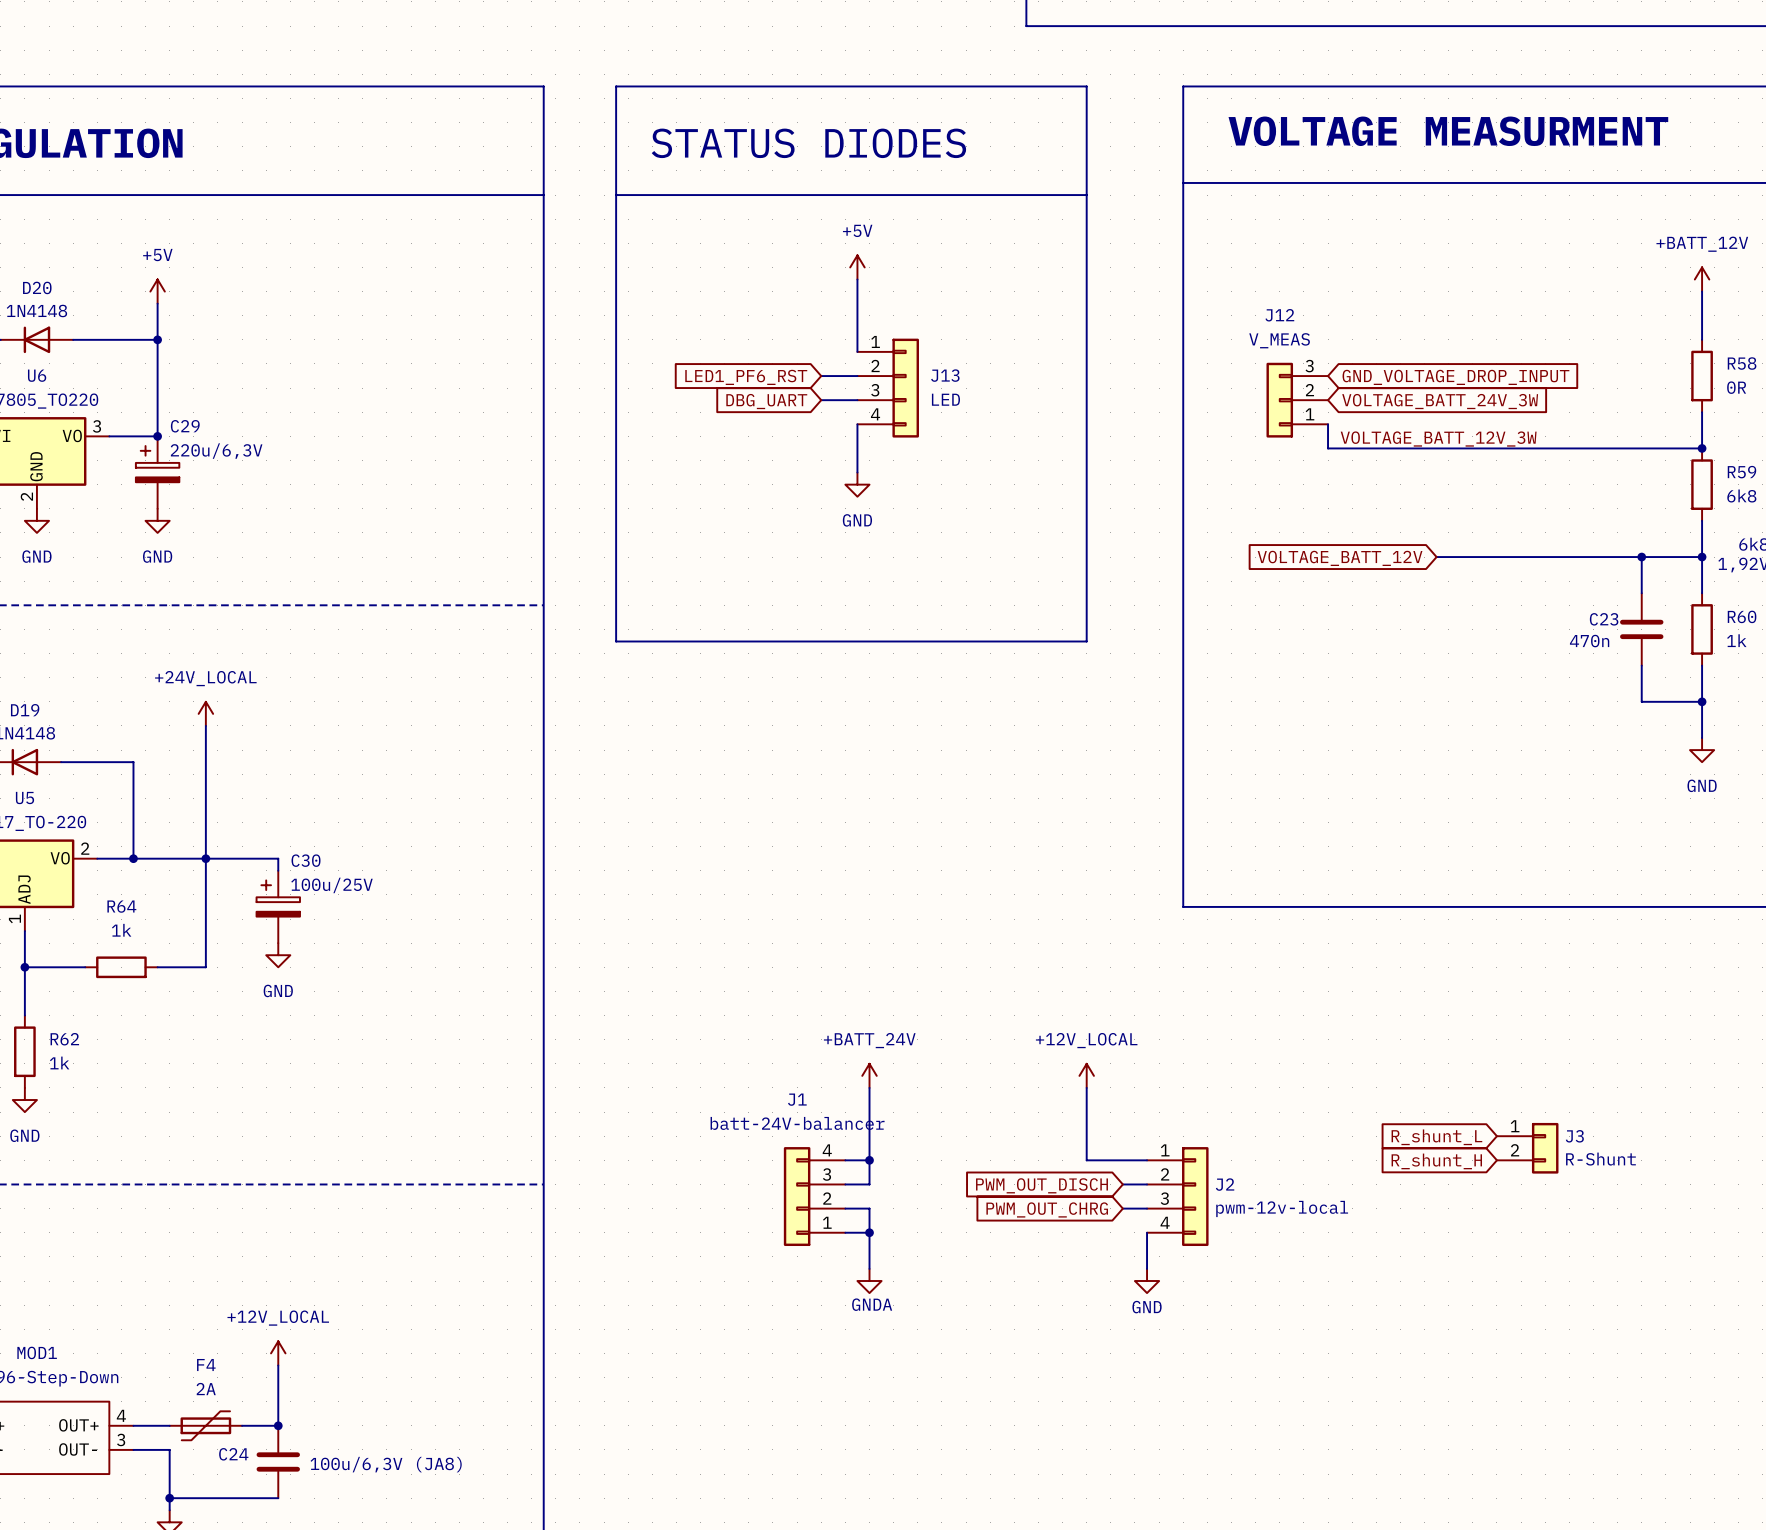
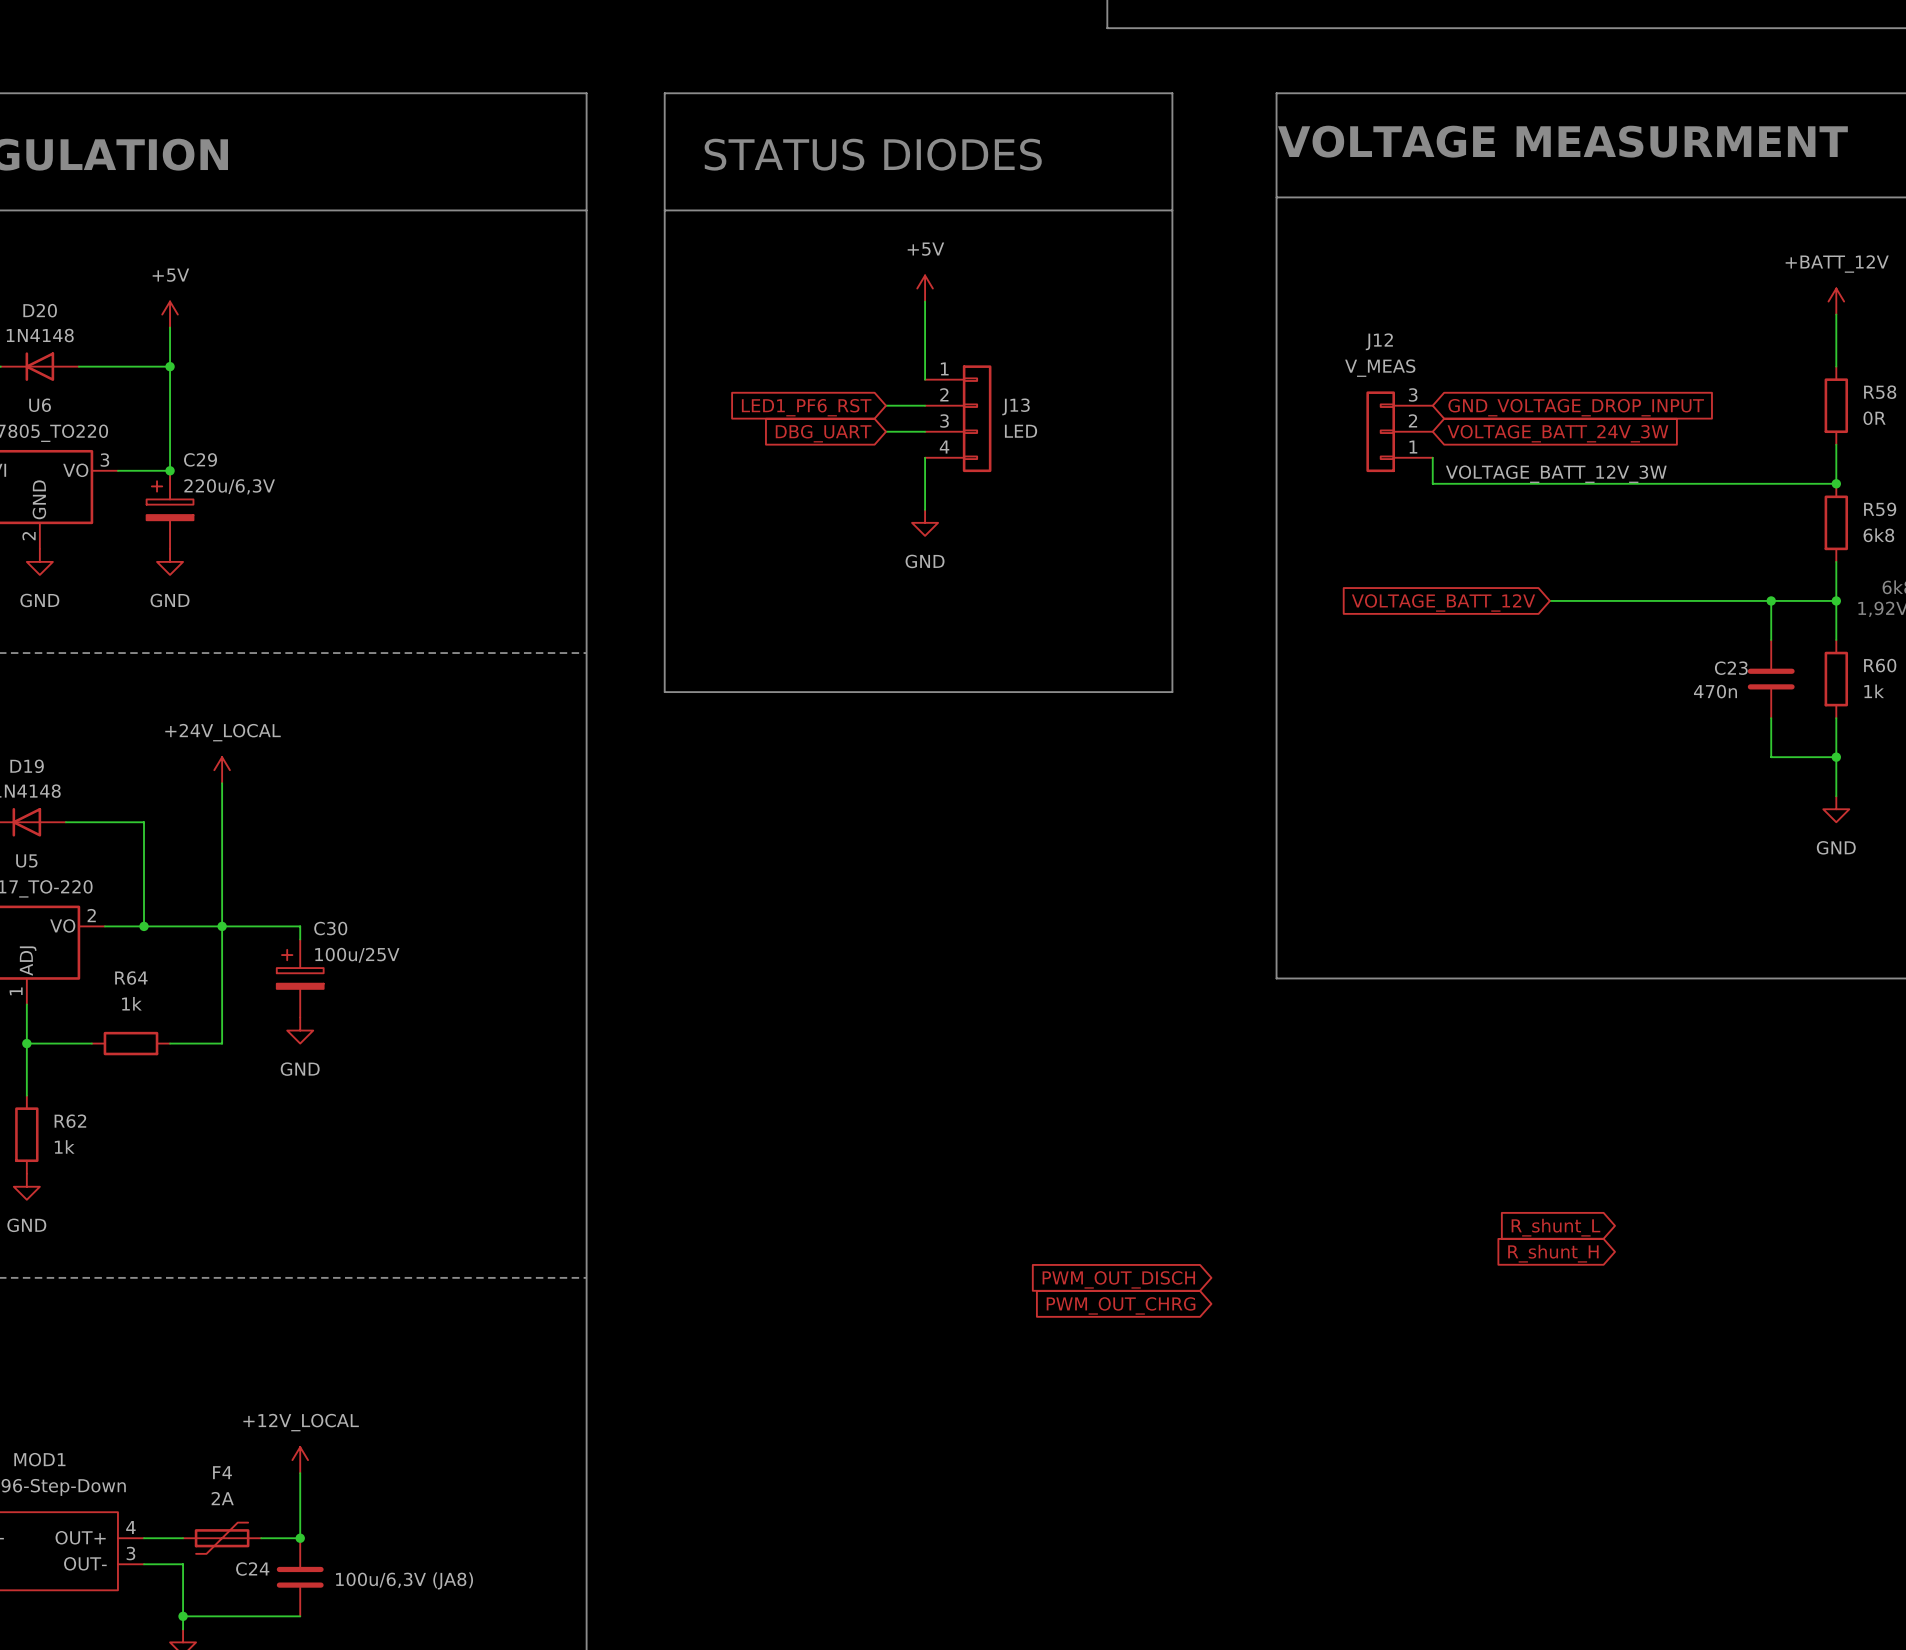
power symbol: +BATT_24V (869, 1075) -> none
power symbol: +12V_LOCAL (1086, 1075) -> none
wire: (869, 1087) (869, 1184) (845, 1184) -> none
wire: (1086, 1087) (1086, 1160) (1147, 1160) -> none
J3: R-Shunt (1527, 1148) -> none
wire: (845, 1160) (869, 1160) -> none
junction: (869, 1160) -> none
wire: (1122, 1184) (1147, 1184) -> none
J1: batt-24V-balancer (814, 1196) -> none
J2: pwm-12v-local (1177, 1196) -> none
wire: (845, 1208) (869, 1208) (869, 1268) -> none
wire: (1122, 1208) (1147, 1208) -> none
wire: (845, 1232) (869, 1232) -> none
junction: (869, 1232) -> none
wire: (1147, 1232) (1147, 1268) -> none
power symbol: GNDA (869, 1281) -> none
power symbol: GND (1147, 1281) -> none

